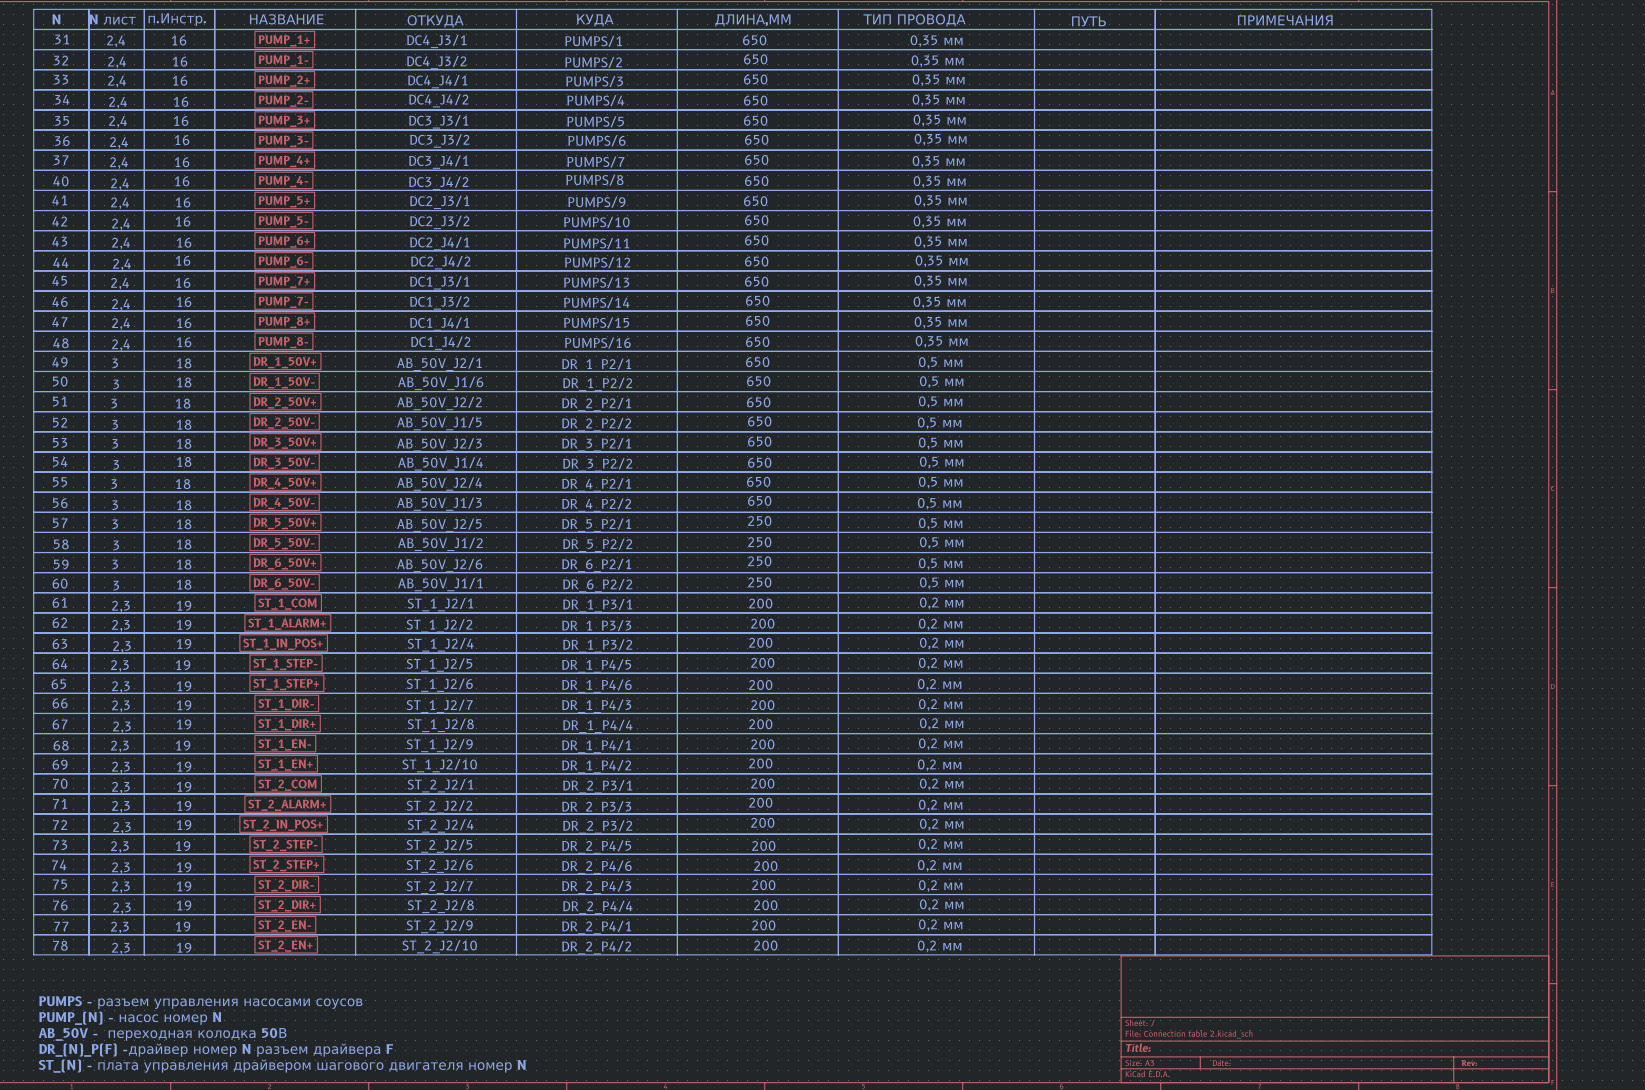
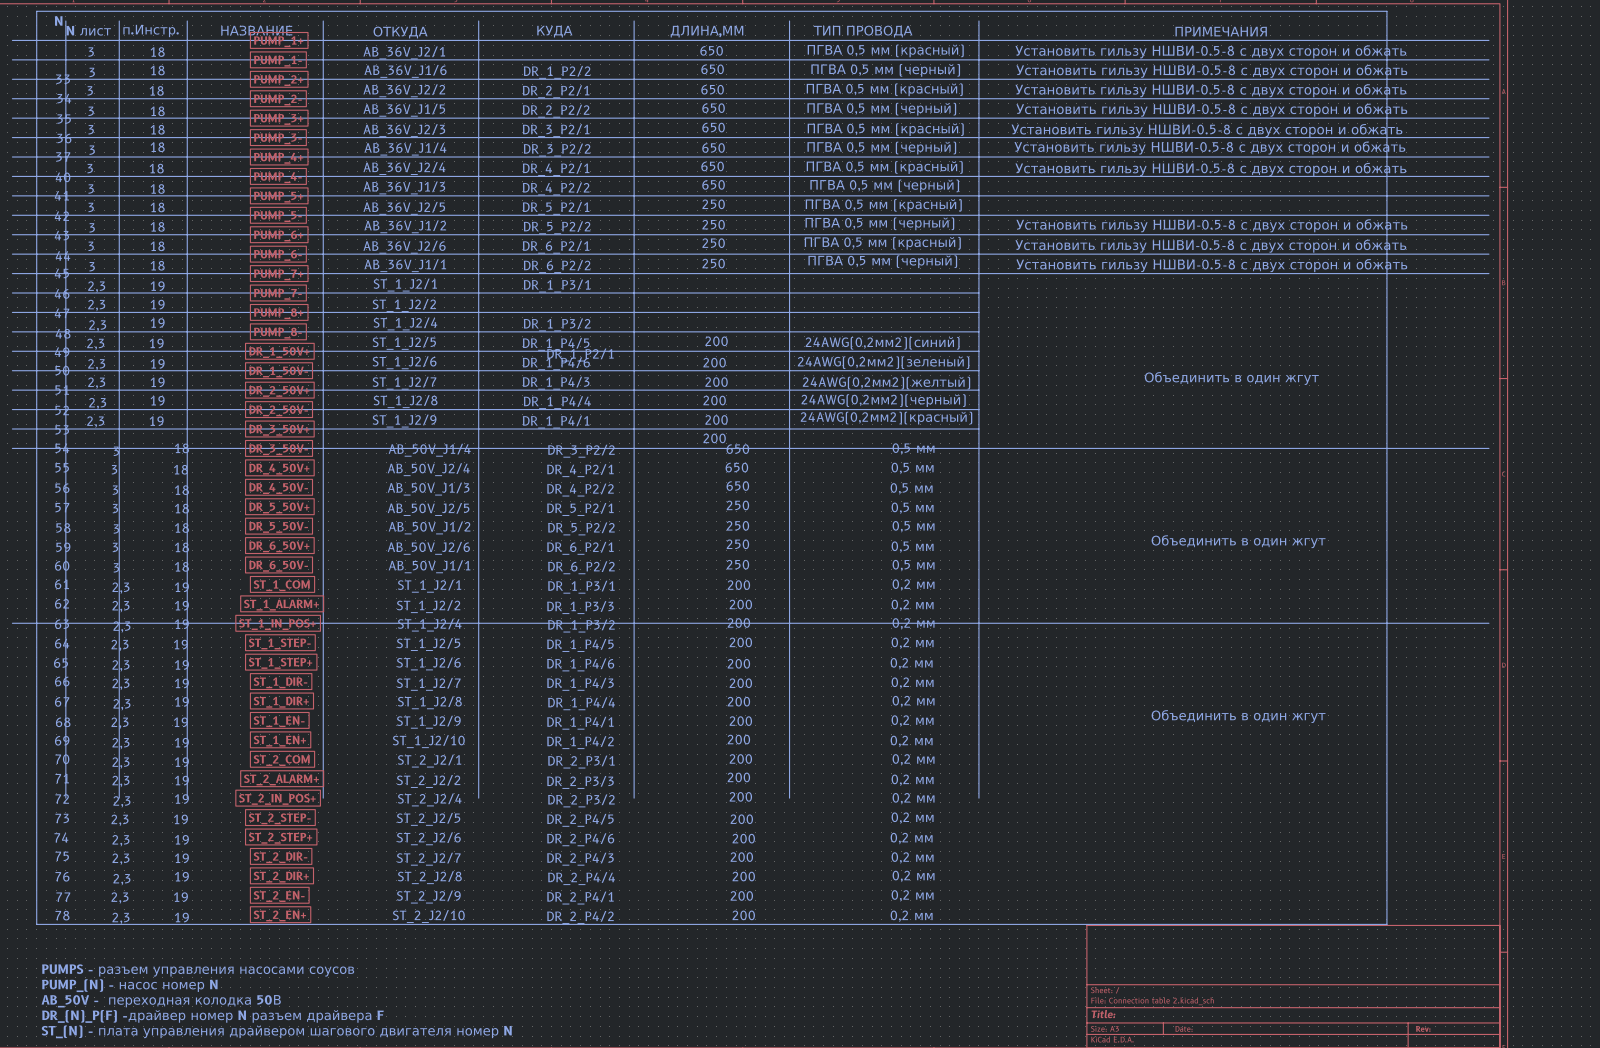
line: (89, 9) (89, 954) -> none
line: (144, 9) (144, 954) -> none
line: (214, 9) (214, 954) -> none
line: (355, 9) (355, 954) -> none
line: (516, 9) (516, 954) -> none
line: (677, 9) (677, 954) -> none
line: (838, 9) (838, 954) -> none
line: (1034, 9) (1034, 954) -> none
line: (1155, 9) (1155, 954) -> none
line: none -> (65, 21) (65, 798)
text position: N лист (112, 19) -> N лист (88, 30)
line: none -> (119, 21) (119, 798)
text position: п.Инстр. (177, 19) -> п.Инстр. (151, 31)
line: none -> (187, 21) (187, 798)
text position: НАЗВАНИЕ (286, 19) -> НАЗВАНИЕ (256, 30)
line: none -> (323, 21) (323, 798)
line: none -> (478, 21) (478, 798)
line: none -> (634, 21) (634, 798)
line: none -> (789, 21) (789, 798)
line: none -> (978, 21) (978, 798)
text position: КУДА (595, 20) -> КУДА (554, 31)
text position: ДЛИНА,ММ (752, 20) -> ДЛИНА,ММ (706, 31)
text position: ТИП ПРОВОДА (914, 20) -> ТИП ПРОВОДА (863, 31)
text position: ПРИМЕЧАНИЯ (1285, 20) -> ПРИМЕЧАНИЯ (1221, 31)
text position: ОТКУДА (435, 21) -> ОТКУДА (400, 32)
text: ПУТЬ (1088, 21) -> none
line: (33, 29) (1431, 29) -> none
line: none -> (12, 40) (1488, 40)
text: 31 (62, 39) -> none
text: 16 (179, 40) -> none
text: 650 (754, 40) -> none
text: 2,4 (116, 41) -> none
text: DC4_J3/1 (436, 41) -> none
text: PUMPS/1 (593, 41) -> none
text: 0,35 мм (936, 41) -> none
line: (33, 49) (1431, 49) -> none
text: none -> 650 (711, 50)
text: none -> ПГВА 0,5 мм (красный) (885, 50)
text: none -> 3 (91, 52)
text: none -> 18 (157, 52)
text: none -> Установить гильзу НШВИ-0.5-8 с двух сторон и обжать (1210, 51)
text: none -> AB_36V_J2/1 (404, 52)
line: none -> (12, 59) (1488, 59)
text: 650 (755, 59) -> none
text: 32 (61, 60) -> none
text: 16 (180, 61) -> none
text: 0,35 мм (937, 61) -> none
text: 2,4 (117, 62) -> none
text: DC4_J3/2 (436, 62) -> none
text: PUMPS/2 (593, 62) -> none
line: (33, 69) (1431, 69) -> none
text: none -> 650 (712, 69)
text: none -> 18 (157, 70)
text: none -> ПГВА 0,5 мм (черный) (885, 70)
text: none -> AB_36V_J1/6 (405, 71)
text: none -> Установить гильзу НШВИ-0.5-8 с двух сторон и обжать (1211, 71)
text: none -> 3 (92, 72)
text: none -> DR_1_P2/2 (557, 72)
line: none -> (12, 79) (1488, 79)
text: 650 (755, 79) -> none
text: 16 (180, 80) -> none
text: 0,35 мм (938, 80) -> none
text: 2,4 (117, 81) -> none
text: DC4_J4/1 (437, 81) -> none
text: PUMPS/3 (594, 81) -> none
line: (33, 89) (1431, 89) -> none
text: none -> 650 (712, 89)
text: none -> ПГВА 0,5 мм (красный) (884, 89)
text: none -> 3 (90, 90)
text: none -> 18 (156, 90)
text: none -> AB_36V_J2/2 (404, 90)
text: none -> Установить гильзу НШВИ-0.5-8 с двух сторон и обжать (1210, 90)
text: none -> DR_2_P2/1 (556, 91)
line: none -> (12, 98) (1488, 98)
text: DC4_J4/2 (438, 100) -> none
text: PUMPS/4 (595, 100) -> none
text: 650 (755, 100) -> none
text: 0,35 мм (938, 100) -> none
text: 16 (181, 101) -> none
text: 2,4 (118, 102) -> none
line: (33, 109) (1431, 109) -> none
text: none -> 650 (713, 108)
text: none -> ПГВА 0,5 мм (черный) (881, 109)
text: none -> AB_36V_J1/5 (404, 110)
text: none -> Установить гильзу НШВИ-0.5-8 с двух сторон и обжать (1211, 110)
text: none -> 3 (91, 111)
text: none -> 18 (157, 111)
text: none -> DR_2_P2/2 (556, 111)
line: none -> (12, 118) (1488, 118)
text: 16 (181, 120) -> none
text: 650 (755, 120) -> none
text: 0,35 мм (939, 120) -> none
text: 2,4 (118, 121) -> none
text: DC3_J3/1 (438, 121) -> none
text: PUMPS/5 (595, 121) -> none
text: none -> 650 (713, 127)
line: (33, 130) (1431, 130) -> none
text: none -> ПГВА 0,5 мм (красный) (885, 129)
text: none -> 3 (91, 129)
text: none -> 18 (157, 129)
text: none -> AB_36V_J2/3 (404, 130)
text: none -> DR_3_P2/1 (556, 130)
text: none -> Установить гильзу НШВИ-0.5-8 с двух сторон и обжать (1206, 130)
text: 650 (756, 139) -> none
text: 0,35 мм (940, 139) -> none
line: none -> (12, 137) (1488, 137)
text: 16 (182, 140) -> none
text: PUMPS/6 (596, 140) -> none
text: DC3_J3/2 (439, 141) -> none
text: 2,4 (119, 143) -> none
line: (33, 150) (1431, 150) -> none
text: none -> 18 (157, 147)
text: none -> 650 (713, 147)
text: none -> ПГВА 0,5 мм (черный) (881, 148)
text: none -> Установить гильзу НШВИ-0.5-8 с двух сторон и обжать (1209, 148)
text: none -> AB_36V_J1/4 (405, 149)
text: none -> 3 (92, 150)
text: none -> DR_3_P2/2 (557, 150)
text: 650 (756, 159) -> none
line: none -> (12, 157) (1488, 157)
text: PUMPS/7 (595, 161) -> none
text: 0,35 мм (938, 161) -> none
text: 16 (182, 162) -> none
text: DC3_J4/1 (438, 162) -> none
text: 2,4 (119, 163) -> none
line: (33, 170) (1431, 170) -> none
text: none -> 650 (712, 166)
text: none -> ПГВА 0,5 мм (красный) (884, 167)
text: none -> 3 (90, 168)
text: none -> 18 (156, 168)
text: none -> AB_36V_J2/4 (404, 168)
text: none -> DR_4_P2/1 (556, 169)
text: none -> Установить гильзу НШВИ-0.5-8 с двух сторон и обжать (1210, 169)
line: none -> (12, 176) (1488, 176)
text: PUMPS/8 (594, 180) -> none
text: 16 (182, 181) -> none
text: 650 (756, 181) -> none
text: 0,35 мм (939, 182) -> none
text: DC3_J4/2 (438, 183) -> none
text: 2,4 (120, 184) -> none
text: none -> 650 (713, 184)
line: (33, 190) (1431, 190) -> none
text: none -> ПГВА 0,5 мм (черный) (884, 185)
text: none -> AB_36V_J1/3 (404, 187)
text: none -> 3 (91, 189)
text: none -> 18 (157, 189)
text: none -> DR_4_P2/2 (556, 188)
line: none -> (12, 195) (1488, 195)
text: 650 (755, 201) -> none
text: 0,35 мм (940, 201) -> none
text: 16 (183, 202) -> none
text: DC2_J3/1 (439, 202) -> none
text: PUMPS/9 (596, 202) -> none
text: 2,4 (120, 203) -> none
text: none -> 250 (713, 204)
line: (33, 210) (1431, 210) -> none
text: none -> ПГВА 0,5 мм (красный) (883, 205)
text: none -> 3 (91, 207)
text: none -> 18 (157, 207)
text: none -> AB_36V_J2/5 (404, 208)
text: none -> DR_5_P2/1 (556, 208)
line: none -> (12, 215) (1488, 215)
text: 650 (756, 220) -> none
text: 16 (183, 221) -> none
text: DC2_J3/2 (439, 222) -> none
text: PUMPS/10 (596, 222) -> none
text: 0,35 мм (939, 222) -> none
text: 2,4 (121, 224) -> none
text: none -> ПГВА 0,5 мм (черный) (879, 223)
line: (33, 230) (1431, 230) -> none
text: none -> 250 (713, 224)
text: none -> Установить гильзу НШВИ-0.5-8 с двух сторон и обжать (1211, 225)
text: none -> 18 (157, 226)
text: none -> AB_36V_J1/2 (405, 226)
text: none -> 3 (92, 227)
text: none -> DR_5_P2/2 (557, 227)
line: none -> (12, 234) (1488, 234)
text: 650 (756, 240) -> none
text: 16 (184, 242) -> none
text: 0,35 мм (940, 242) -> none
text: 2,4 (121, 243) -> none
text: DC2_J4/1 (439, 243) -> none
text: PUMPS/11 (596, 243) -> none
text: none -> 250 (713, 243)
text: none -> ПГВА 0,5 мм (красный) (882, 243)
line: (33, 250) (1431, 250) -> none
text: none -> 3 (91, 246)
text: none -> 18 (157, 246)
text: none -> Установить гильзу НШВИ-0.5-8 с двух сторон и обжать (1210, 246)
text: none -> AB_36V_J2/6 (404, 247)
text: none -> DR_6_P2/1 (556, 247)
line: none -> (12, 254) (1488, 254)
text: 16 (183, 260) -> none
text: 650 (756, 261) -> none
text: 0,35 мм (941, 261) -> none
text: DC2_J4/2 (440, 262) -> none
text: PUMPS/12 (597, 262) -> none
text: 2,4 (122, 264) -> none
text: none -> ПГВА 0,5 мм (черный) (882, 261)
line: (33, 270) (1431, 270) -> none
text: none -> 250 (713, 263)
text: none -> 18 (157, 265)
text: none -> AB_36V_J1/1 (405, 265)
text: none -> Установить гильзу НШВИ-0.5-8 с двух сторон и обжать (1211, 265)
text: none -> 3 (92, 266)
text: none -> DR_6_P2/2 (557, 266)
line: none -> (12, 273) (1488, 273)
text: 650 (756, 281) -> none
text: 0,35 мм (940, 281) -> none
text: 16 (183, 282) -> none
text: DC1_J3/1 (439, 282) -> none
text: PUMPS/13 (596, 282) -> none
text: 2,4 (120, 283) -> none
line: (33, 291) (1431, 291) -> none
text: none -> ST_1_J2/1 (405, 285)
text: none -> 19 (157, 286)
text: none -> DR_1_P3/1 (557, 286)
text: none -> 2,3 (96, 287)
text: 650 (757, 300) -> none
line: none -> (12, 293) (978, 293)
text: 16 (184, 302) -> none
text: DC1_J3/2 (439, 302) -> none
text: PUMPS/14 (596, 302) -> none
text: 0,35 мм (939, 302) -> none
text: 2,4 (121, 304) -> none
line: (33, 311) (1431, 311) -> none
text: none -> 19 (157, 304)
text: none -> 2,3 (96, 305)
text: none -> ST_1_J2/2 (404, 305)
text: 650 (757, 320) -> none
line: none -> (12, 312) (978, 312)
text: PUMPS/15 (596, 322) -> none
text: 0,35 мм (940, 322) -> none
text: 16 (184, 323) -> none
text: 2,4 (121, 324) -> none
text: DC1_J4/1 (439, 324) -> none
line: (33, 331) (1431, 331) -> none
text: none -> 19 (157, 323)
text: none -> ST_1_J2/4 (405, 323)
text: none -> DR_1_P3/2 (557, 324)
text: none -> 2,3 (97, 325)
line: none -> (12, 331) (978, 331)
text: 0,35 мм (941, 341) -> none
text: 16 (184, 342) -> none
text: 650 (757, 342) -> none
text: DC1_J4/2 (440, 343) -> none
text: PUMPS/16 (597, 343) -> none
text: 2,4 (121, 345) -> none
line: (33, 351) (1431, 351) -> none
text: none -> 200 (716, 341)
text: none -> 19 (156, 343)
text: none -> ST_1_J2/5 (404, 343)
text: none -> 24AWG(0,2мм2)(синий) (882, 343)
text: none -> 2,3 (95, 344)
text: none -> DR_1_P4/5 (556, 344)
line: none -> (12, 351) (978, 351)
text: 650 (757, 362) -> none
text: 3 (115, 363) -> none
text: 18 (184, 363) -> none
text: 0,5 мм (940, 363) -> none
text: AB_50V_J2/1 (439, 364) -> none
line: (33, 371) (1431, 371) -> none
text: none -> ST_1_J2/6 (404, 362)
text: none -> 200 (714, 362)
text: none -> 24AWG(0,2мм2)(зеленый) (883, 362)
text: none -> 19 (157, 363)
text: none -> DR_1_P4/6 (556, 363)
text: none -> 2,3 (96, 364)
line: none -> (12, 370) (978, 370)
text: 650 (758, 381) -> none
text: 18 (184, 382) -> none
text: 0,5 мм (941, 382) -> none
text: AB_50V_J1/6 (440, 383) -> none
text: 3 (116, 384) -> none
text: DR_1_P2/2 (597, 384) -> none
text: none -> Объединить в один жгут (1231, 378)
line: (33, 391) (1431, 391) -> none
text: none -> 19 (157, 382)
text: none -> 200 (716, 382)
text: none -> 2,3 (96, 383)
text: none -> ST_1_J2/7 (404, 383)
text: none -> DR_1_P4/3 (556, 383)
text: none -> 24AWG(0,2мм2)(желтый) (886, 383)
line: none -> (12, 390) (978, 390)
text: 650 (758, 402) -> none
text: 0,5 мм (940, 402) -> none
text: 3 (114, 403) -> none
text: 18 (183, 403) -> none
text: AB_50V_J2/2 (439, 403) -> none
text: DR_2_P2/1 (596, 404) -> none
line: (33, 411) (1431, 411) -> none
text: none -> 19 (157, 400)
text: none -> 200 (714, 400)
text: none -> 24AWG(0,2мм2)(черный) (883, 400)
text: none -> ST_1_J2/8 (405, 401)
text: none -> DR_1_P4/4 (557, 402)
text: none -> 2,3 (97, 403)
line: none -> (12, 409) (978, 409)
text: 650 (759, 421) -> none
text: AB_50V_J1/5 (439, 423) -> none
text: 0,5 мм (939, 423) -> none
text: 3 (115, 424) -> none
text: 18 (184, 424) -> none
text: DR_2_P2/2 (596, 424) -> none
text: none -> 24AWG(0,2мм2)(красный) (886, 418)
line: (33, 431) (1431, 431) -> none
text: none -> 200 (716, 419)
text: none -> 19 (156, 421)
text: none -> ST_1_J2/9 (404, 421)
text: none -> 2,3 (95, 422)
text: none -> DR_1_P4/1 (556, 422)
line: none -> (12, 429) (978, 429)
text: 650 (759, 441) -> none
text: 3 (115, 443) -> none
text: 18 (184, 443) -> none
text: 0,5 мм (940, 443) -> none
text: AB_50V_J2/3 (439, 444) -> none
text: DR_3_P2/1 (596, 444) -> none
line: (33, 451) (1431, 451) -> none
text: none -> 200 (714, 438)
line: none -> (12, 448) (1488, 448)
line: (33, 472) (1431, 472) -> none
line: (33, 492) (1431, 492) -> none
line: (33, 512) (1431, 512) -> none
line: (33, 532) (1431, 532) -> none
line: (33, 552) (1431, 552) -> none
text: none -> Объединить в один жгут (1238, 541)
line: (33, 572) (1431, 572) -> none
line: (33, 592) (1431, 592) -> none
line: (33, 612) (1431, 612) -> none
line: (33, 632) (1431, 632) -> none
line: none -> (12, 623) (1488, 623)
line: (33, 653) (1431, 653) -> none
line: (33, 673) (1431, 673) -> none
line: (33, 693) (1431, 693) -> none
line: (33, 713) (1431, 713) -> none
line: (33, 733) (1431, 733) -> none
text: none -> Объединить в один жгут (1238, 716)
line: (33, 753) (1431, 753) -> none
line: (33, 773) (1431, 773) -> none
line: (33, 793) (1431, 793) -> none
line: (33, 814) (1431, 814) -> none
line: (33, 834) (1431, 834) -> none
line: (33, 854) (1431, 854) -> none
line: (33, 874) (1431, 874) -> none
line: (33, 894) (1431, 894) -> none
line: (33, 914) (1431, 914) -> none
line: (33, 934) (1431, 934) -> none

